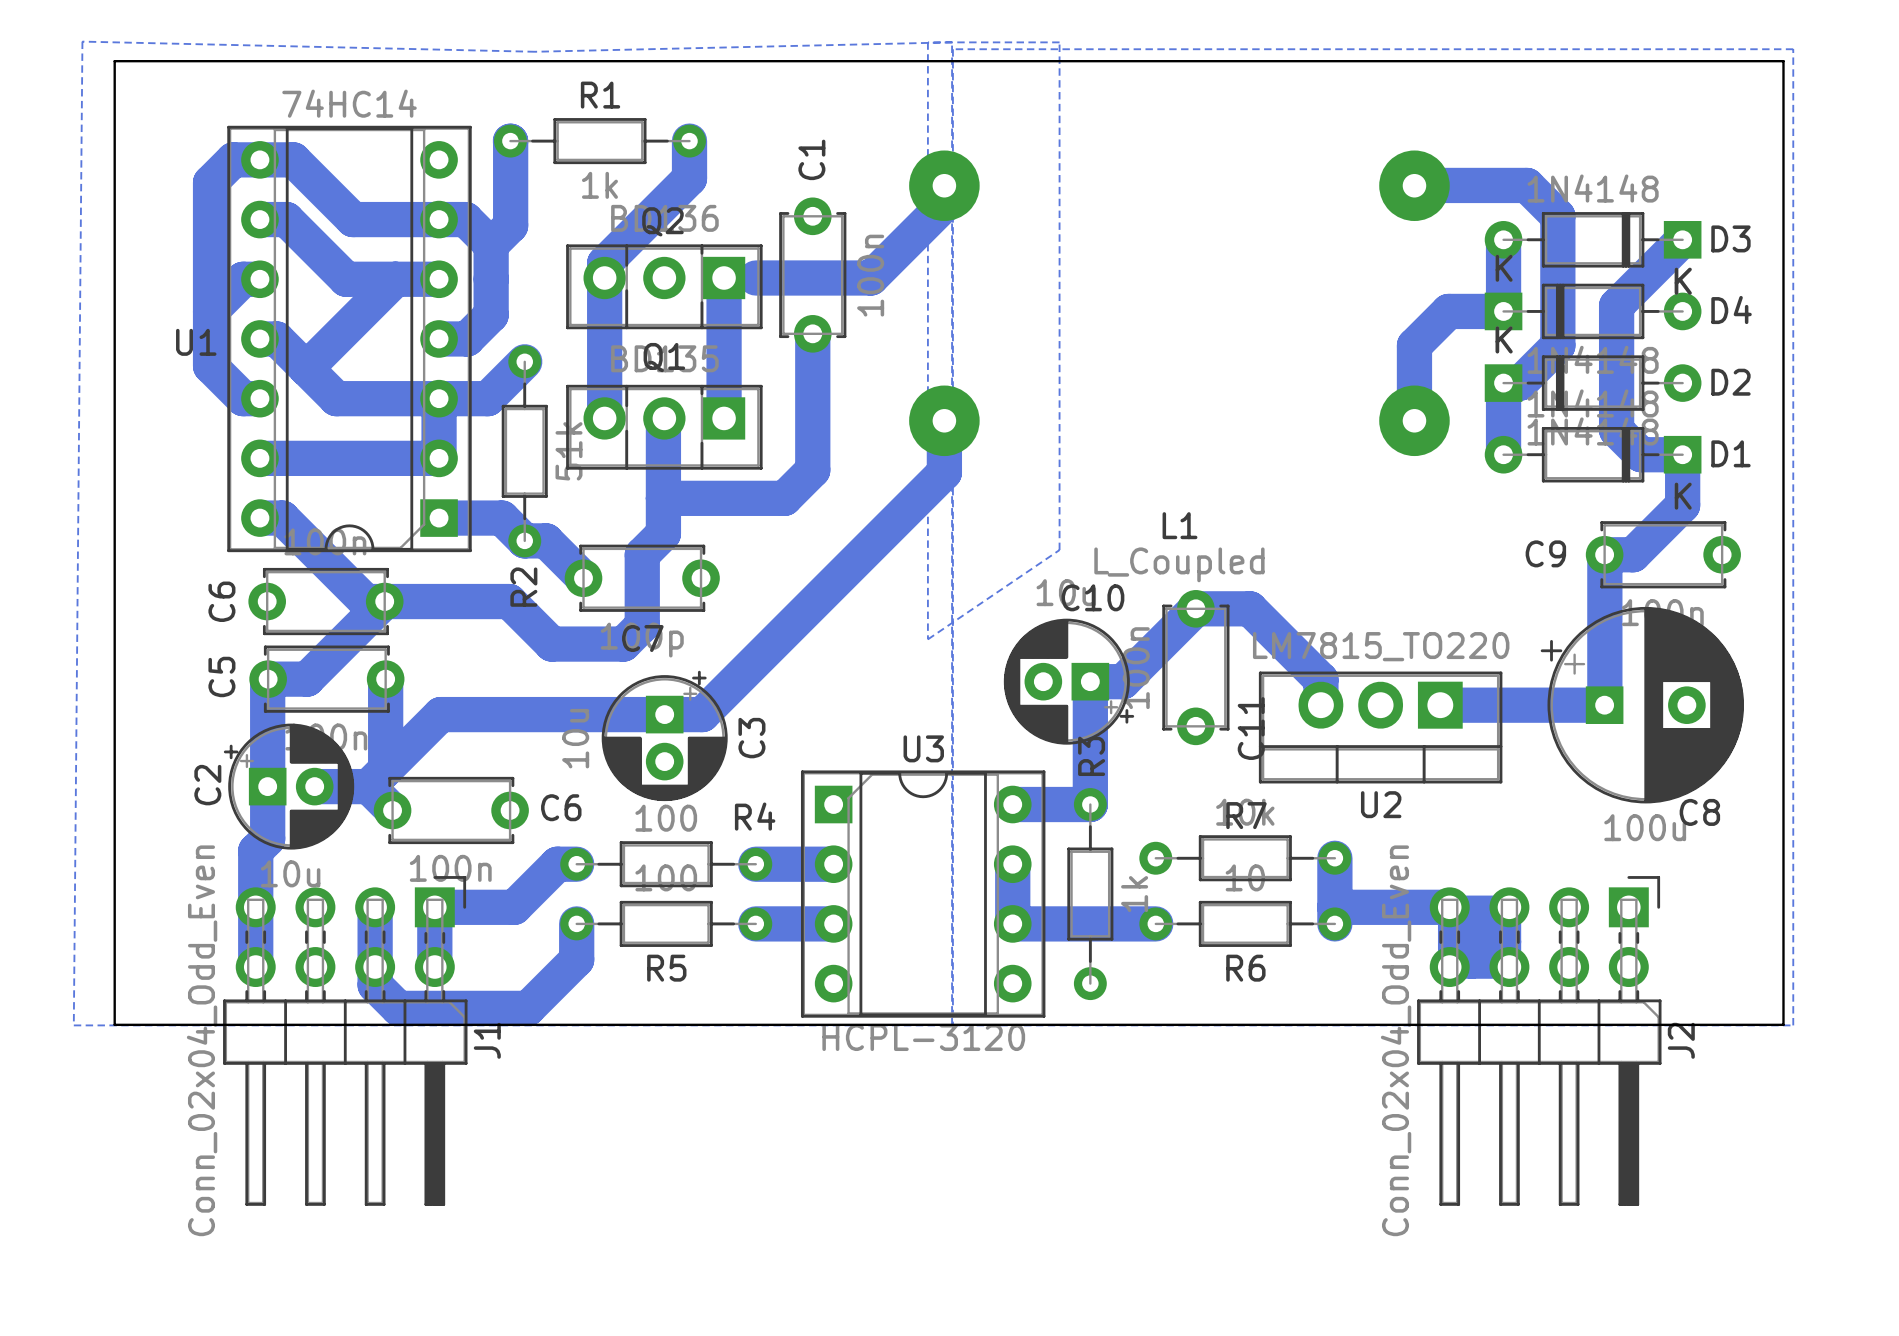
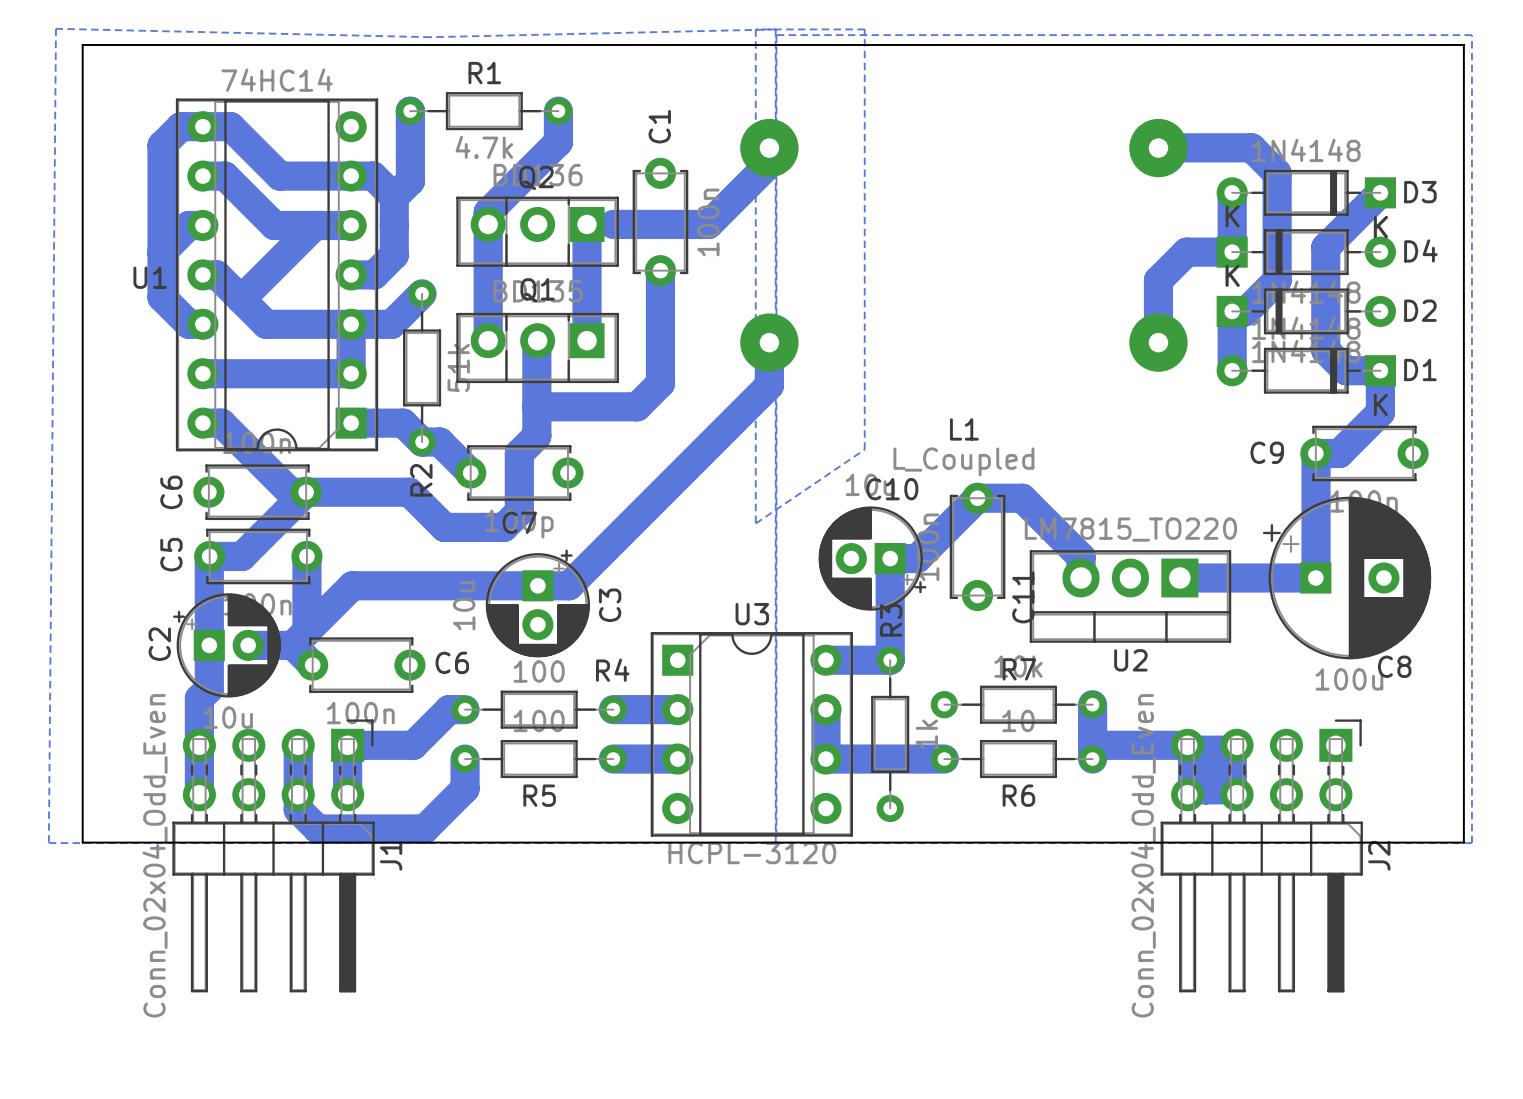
R1 value: 1k (599, 185) -> 4.7k (484, 147)

